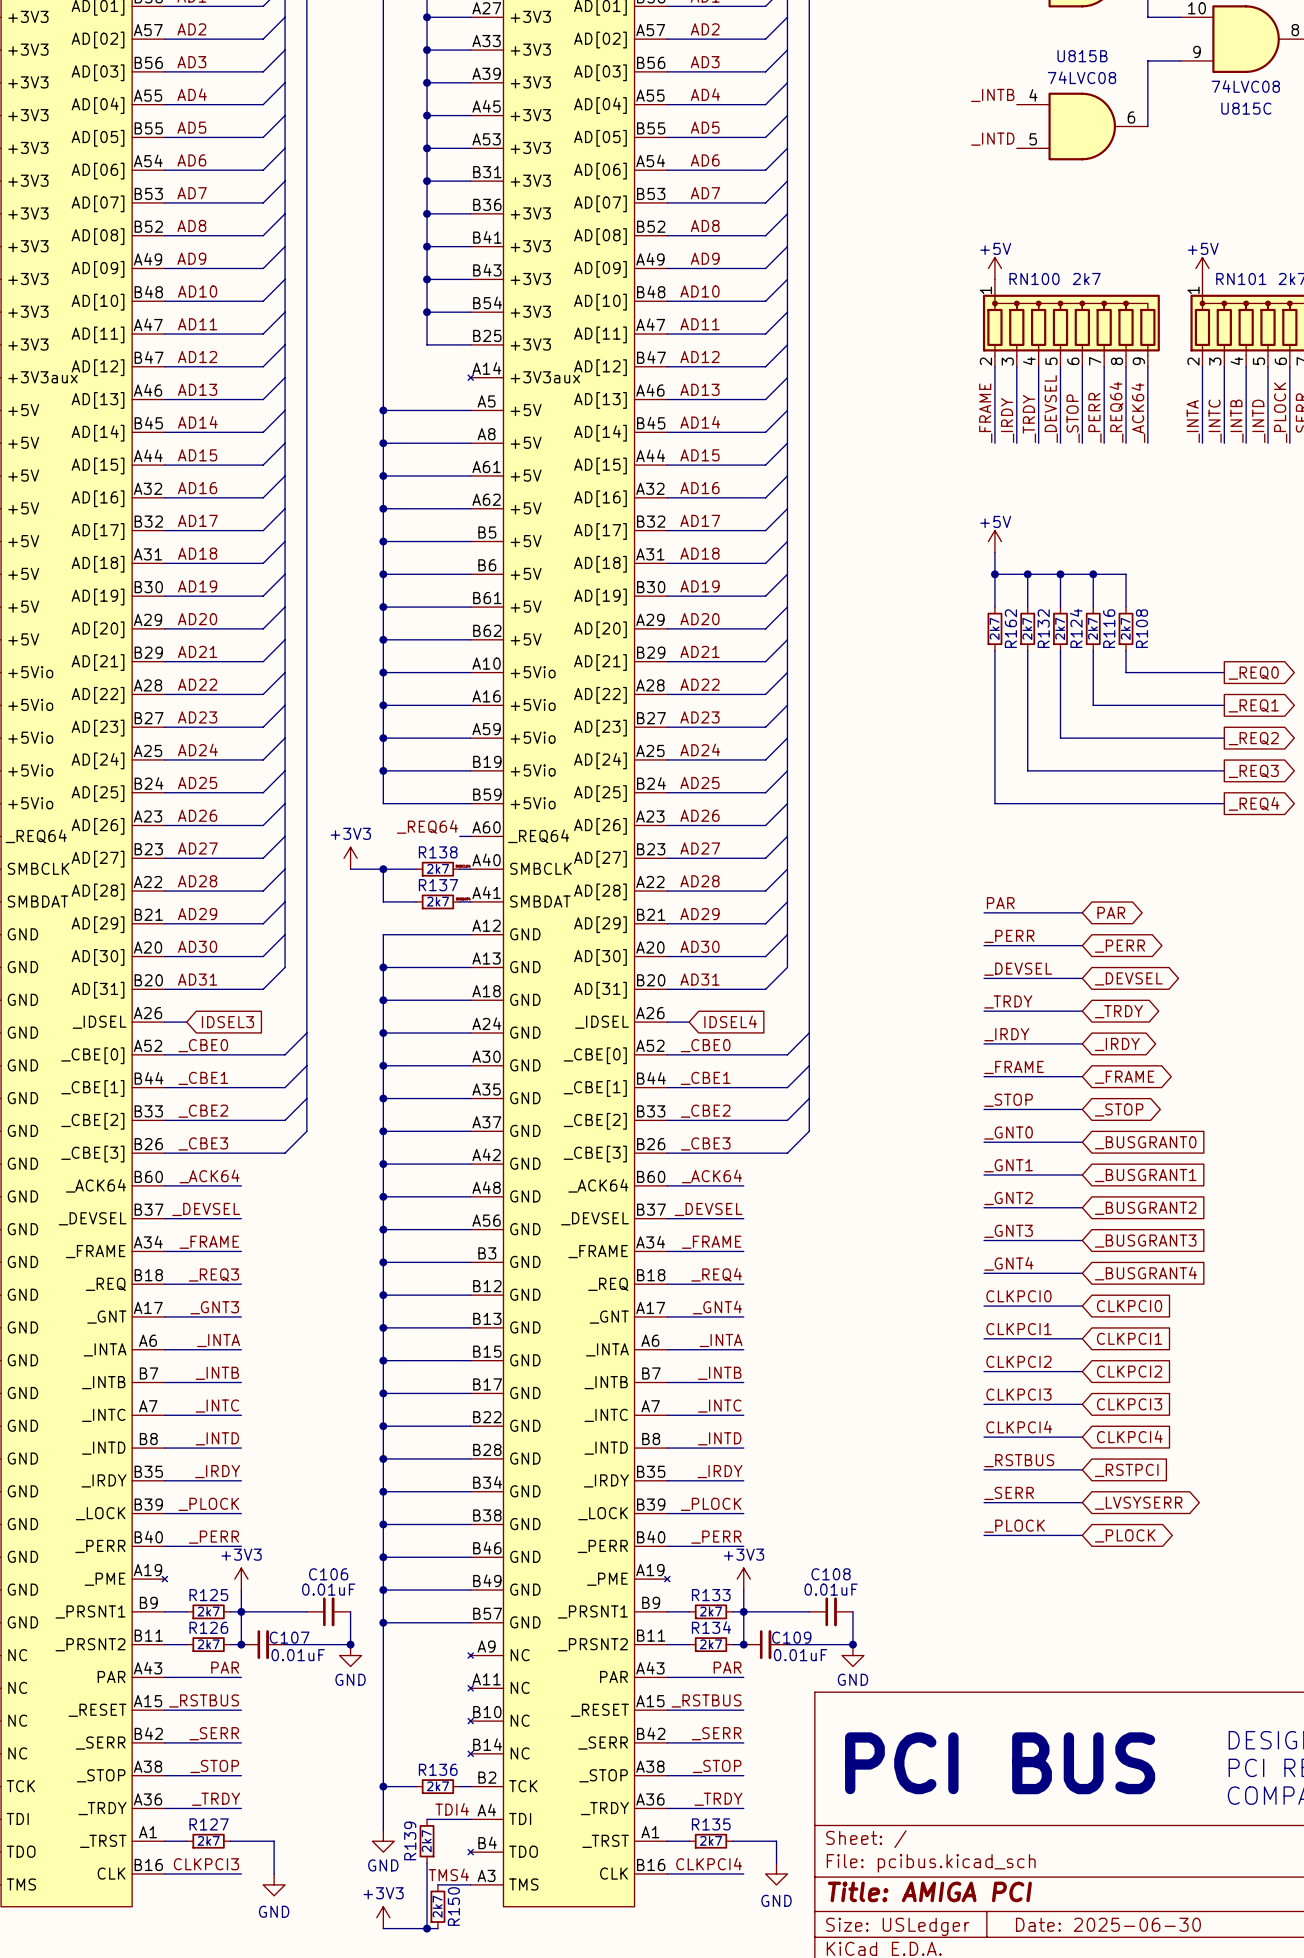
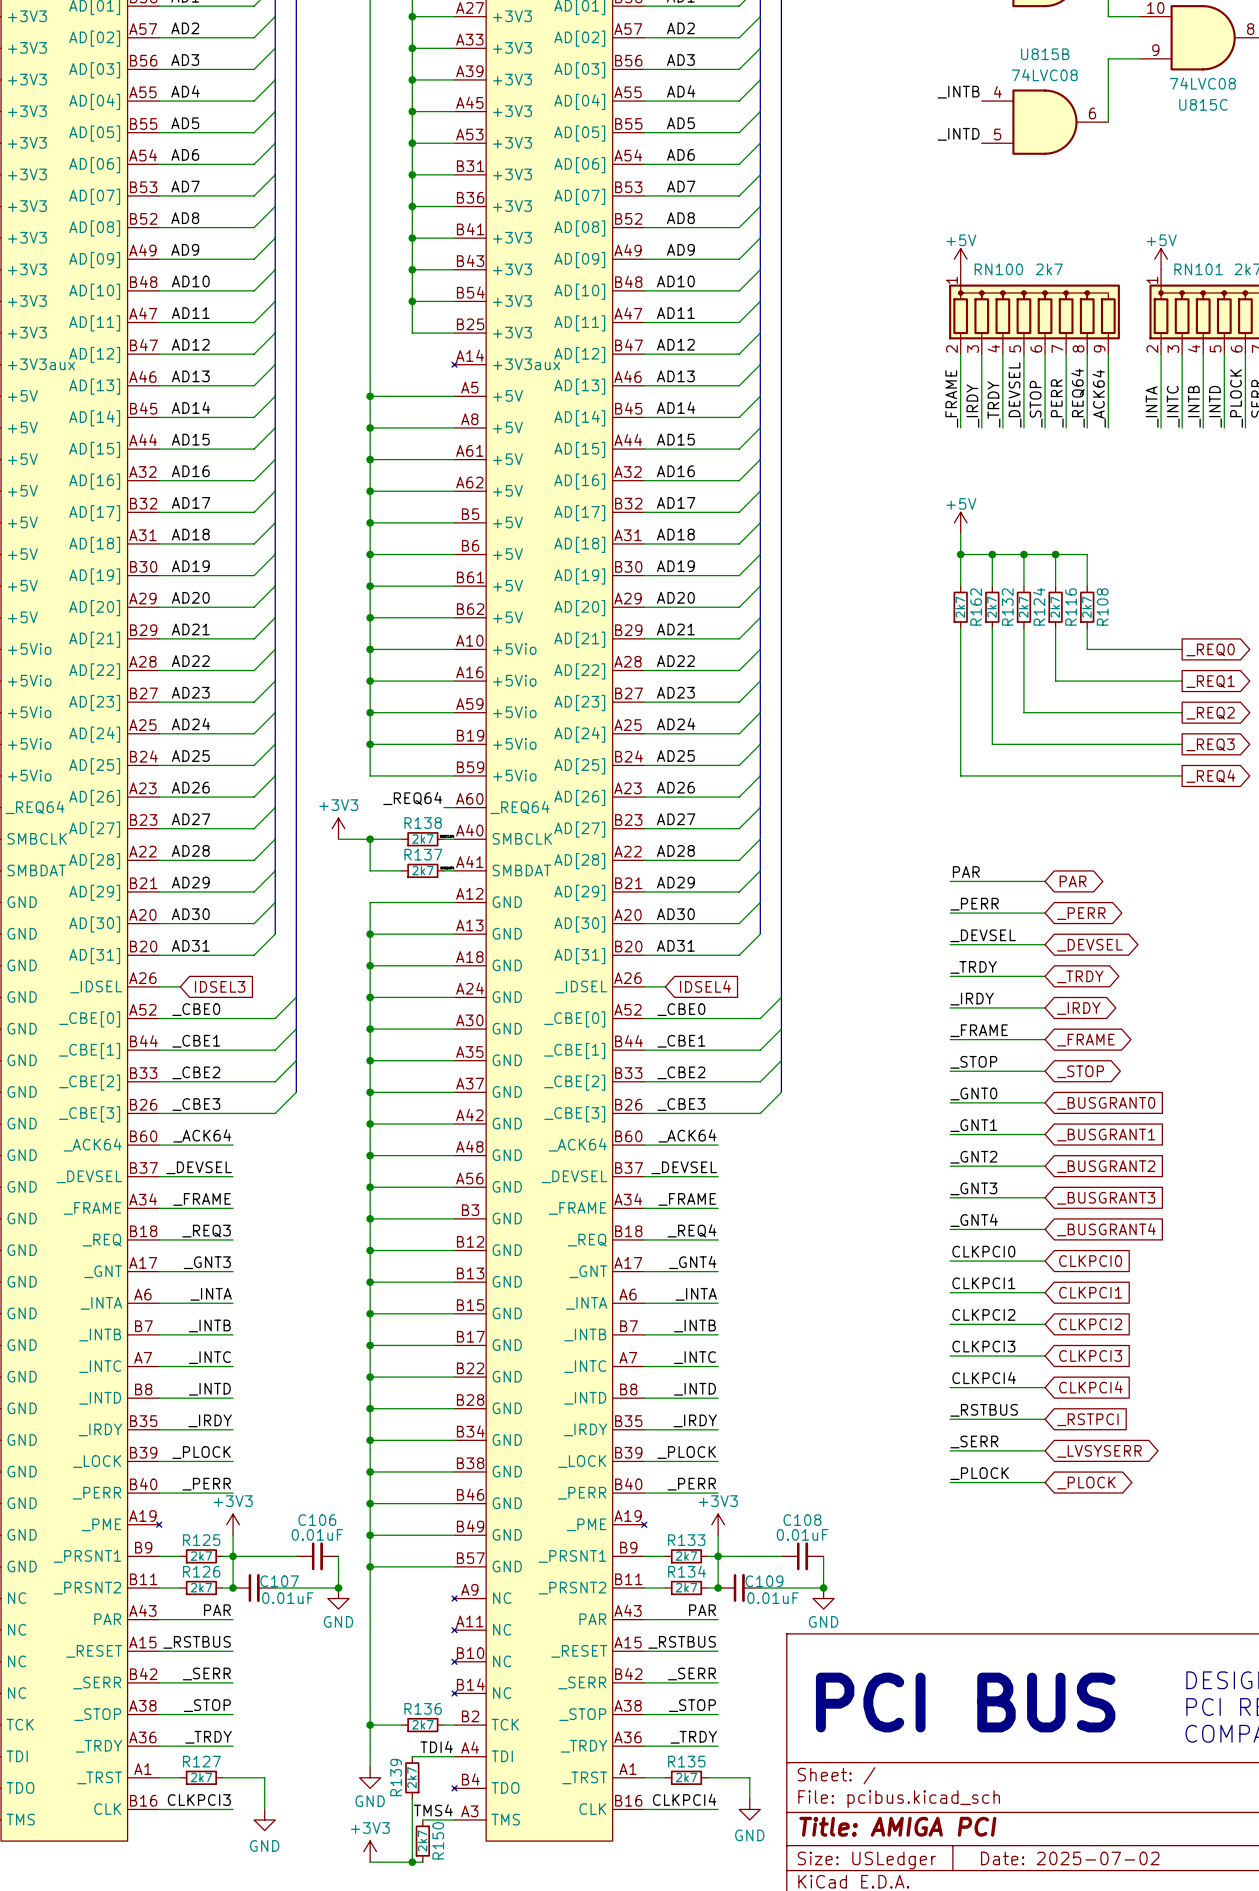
title block: Date: 2025-06-30 (1108, 1924) -> Date: 2025-07-02 (1070, 1858)

